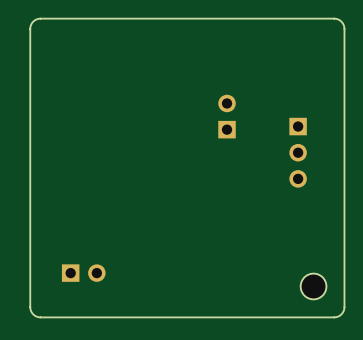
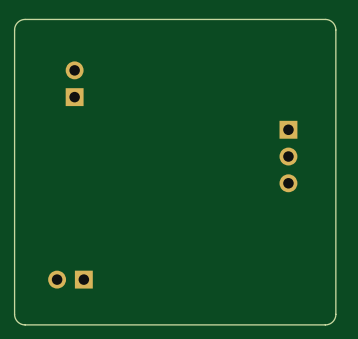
part position: (227, 116) -> (74, 83)
part rotation: 0° (83, 273) -> 180° (70, 279)
part: (313, 286) -> none

